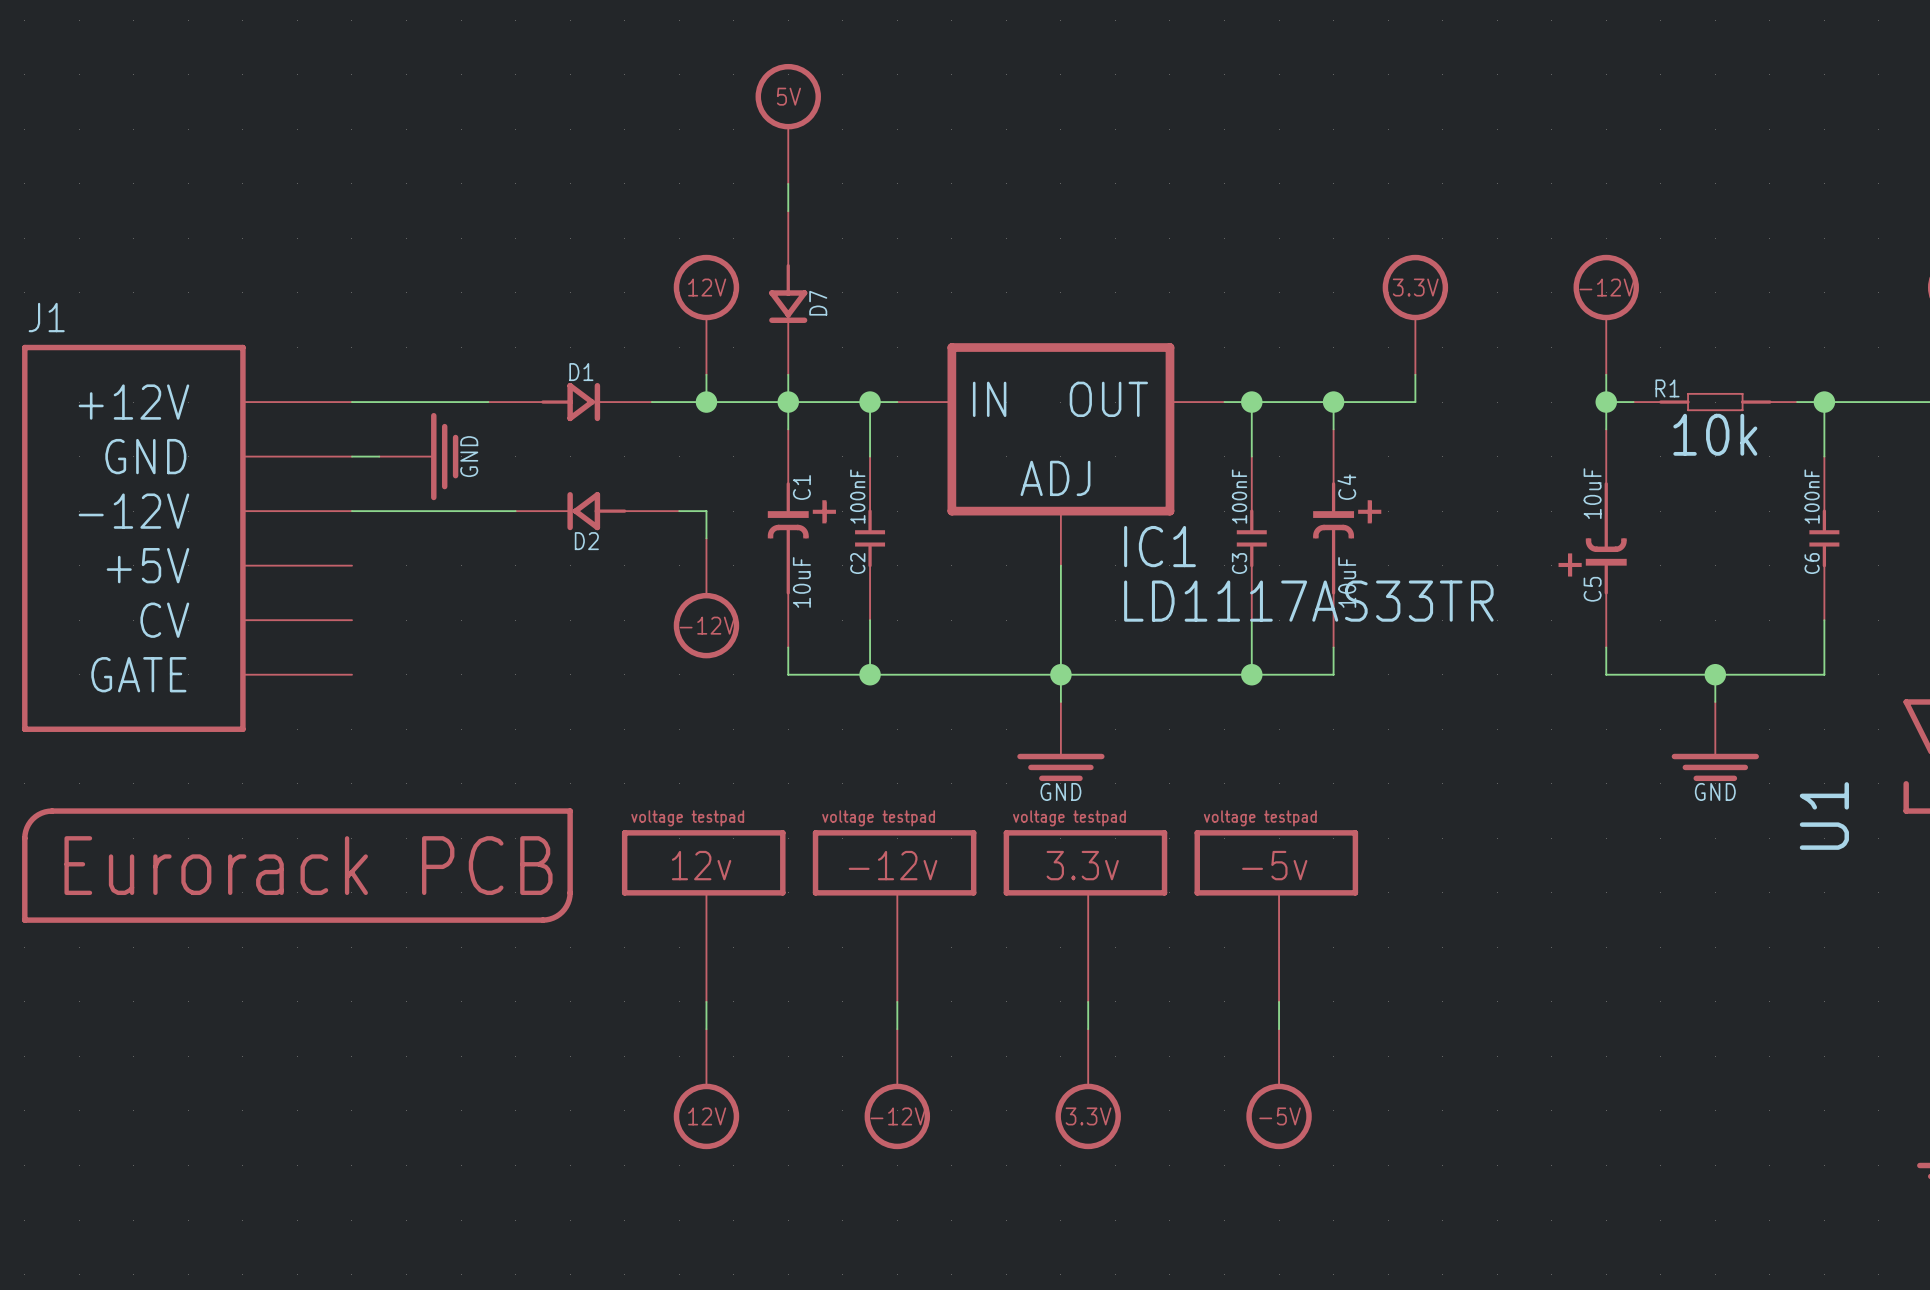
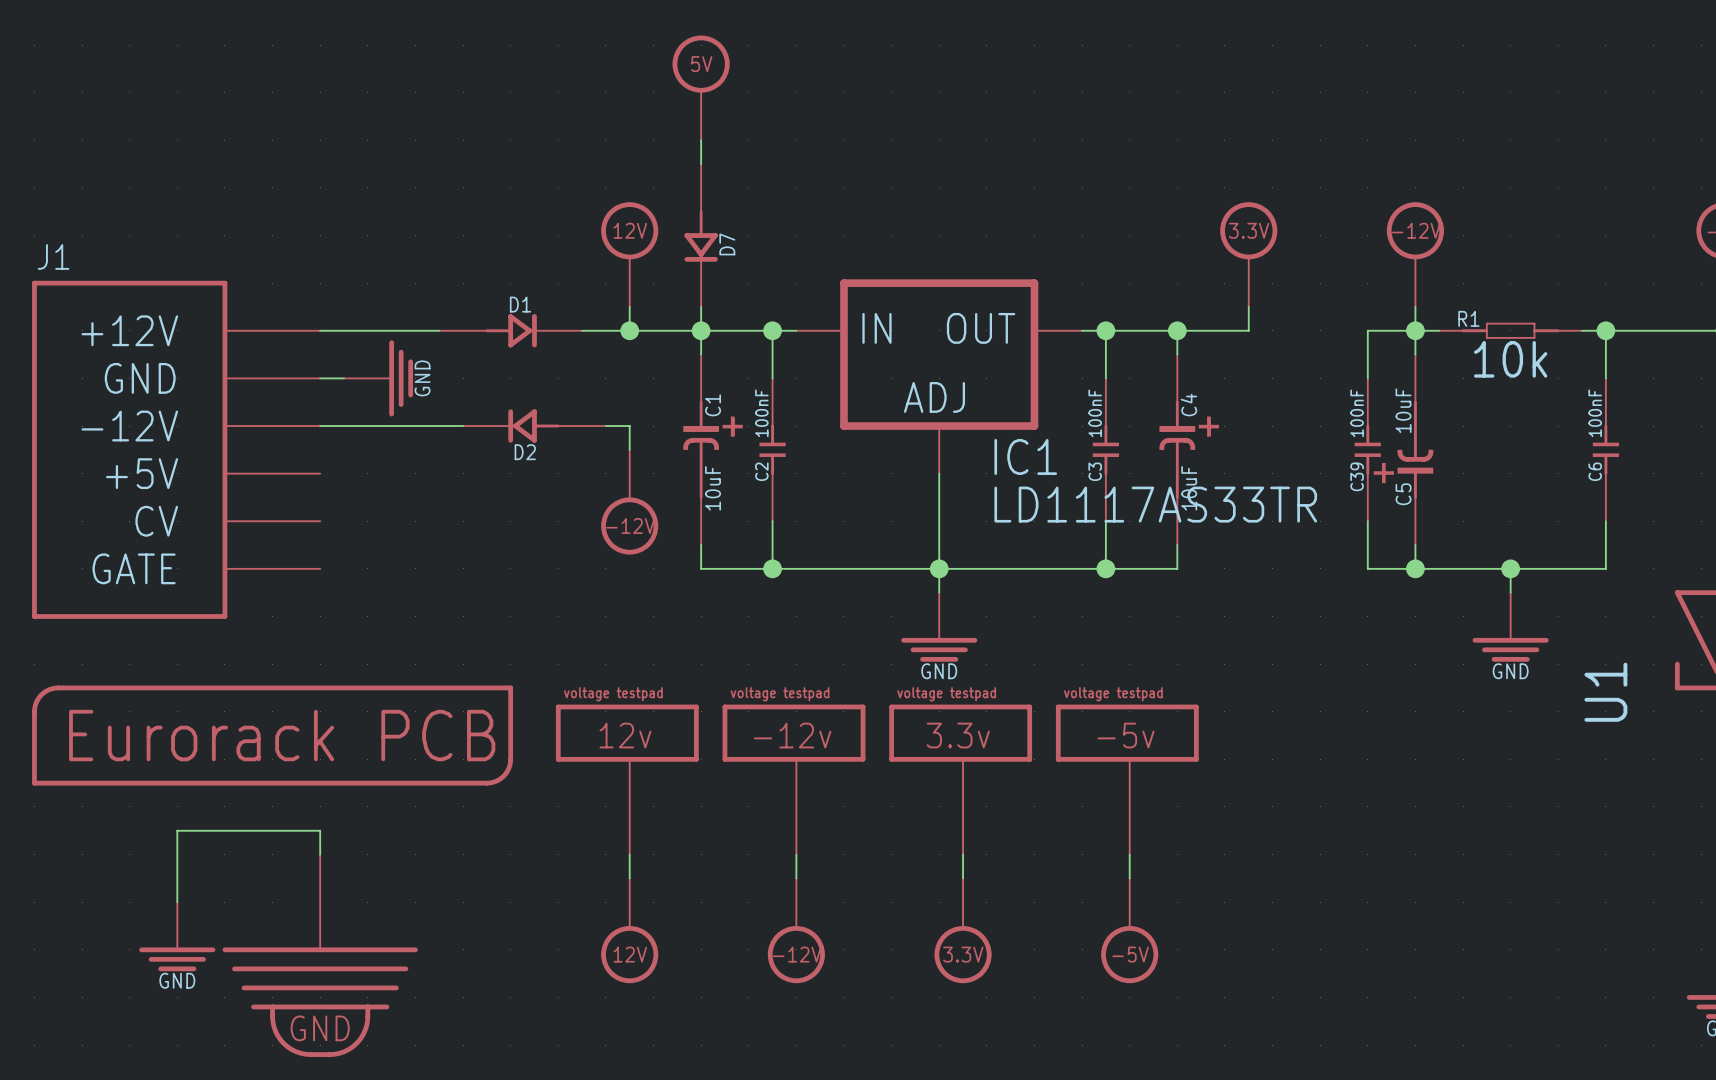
wire: none -> (1415, 330) (1367, 330) (1367, 378)
C39: none -> 100nF (1367, 449)
wire: none -> (1367, 521) (1367, 568) (1415, 568)
junction: none -> (1415, 568)
wire: none -> (320, 854) (320, 830) (177, 830) (177, 902)
power symbol: none -> GND (177, 936)
part: none -> (320, 955)

